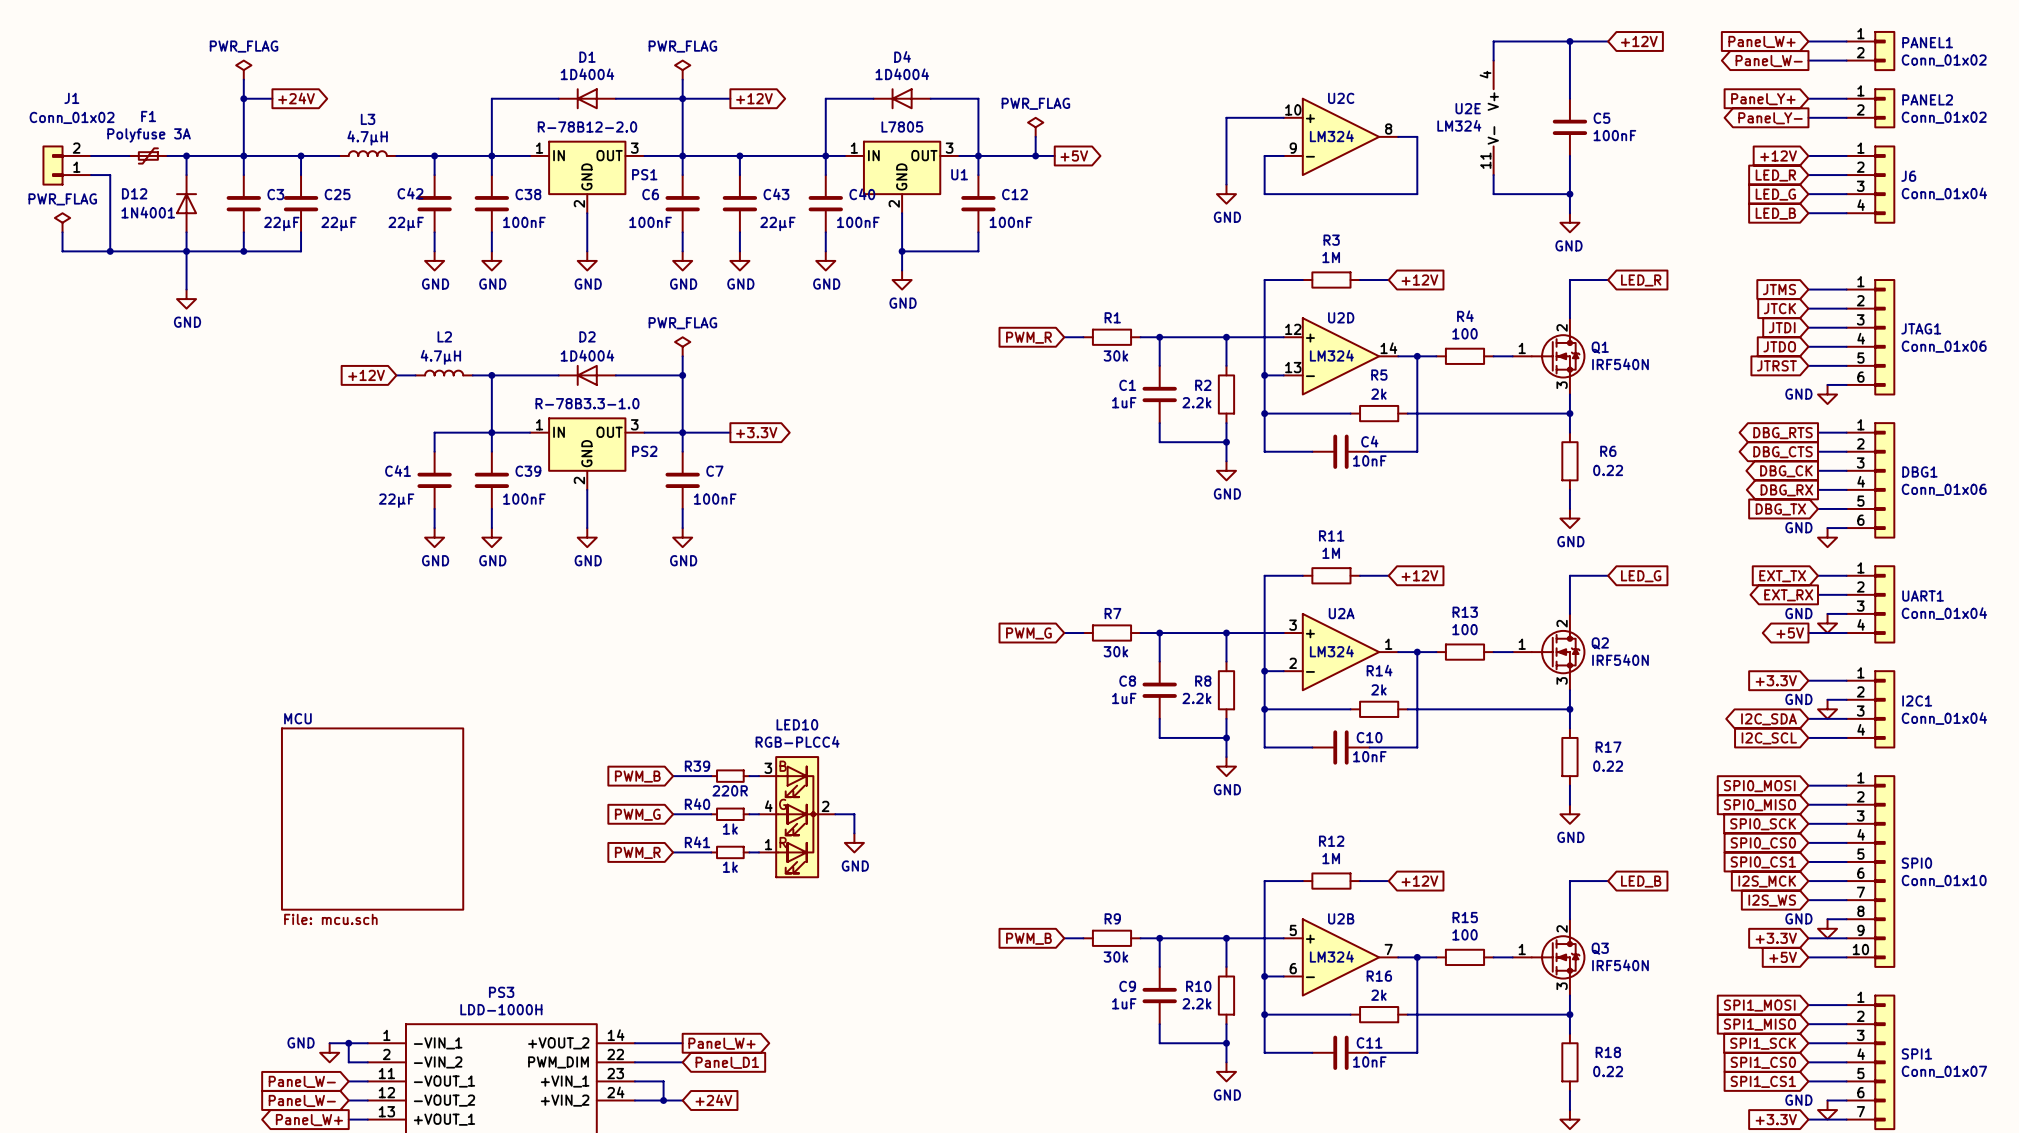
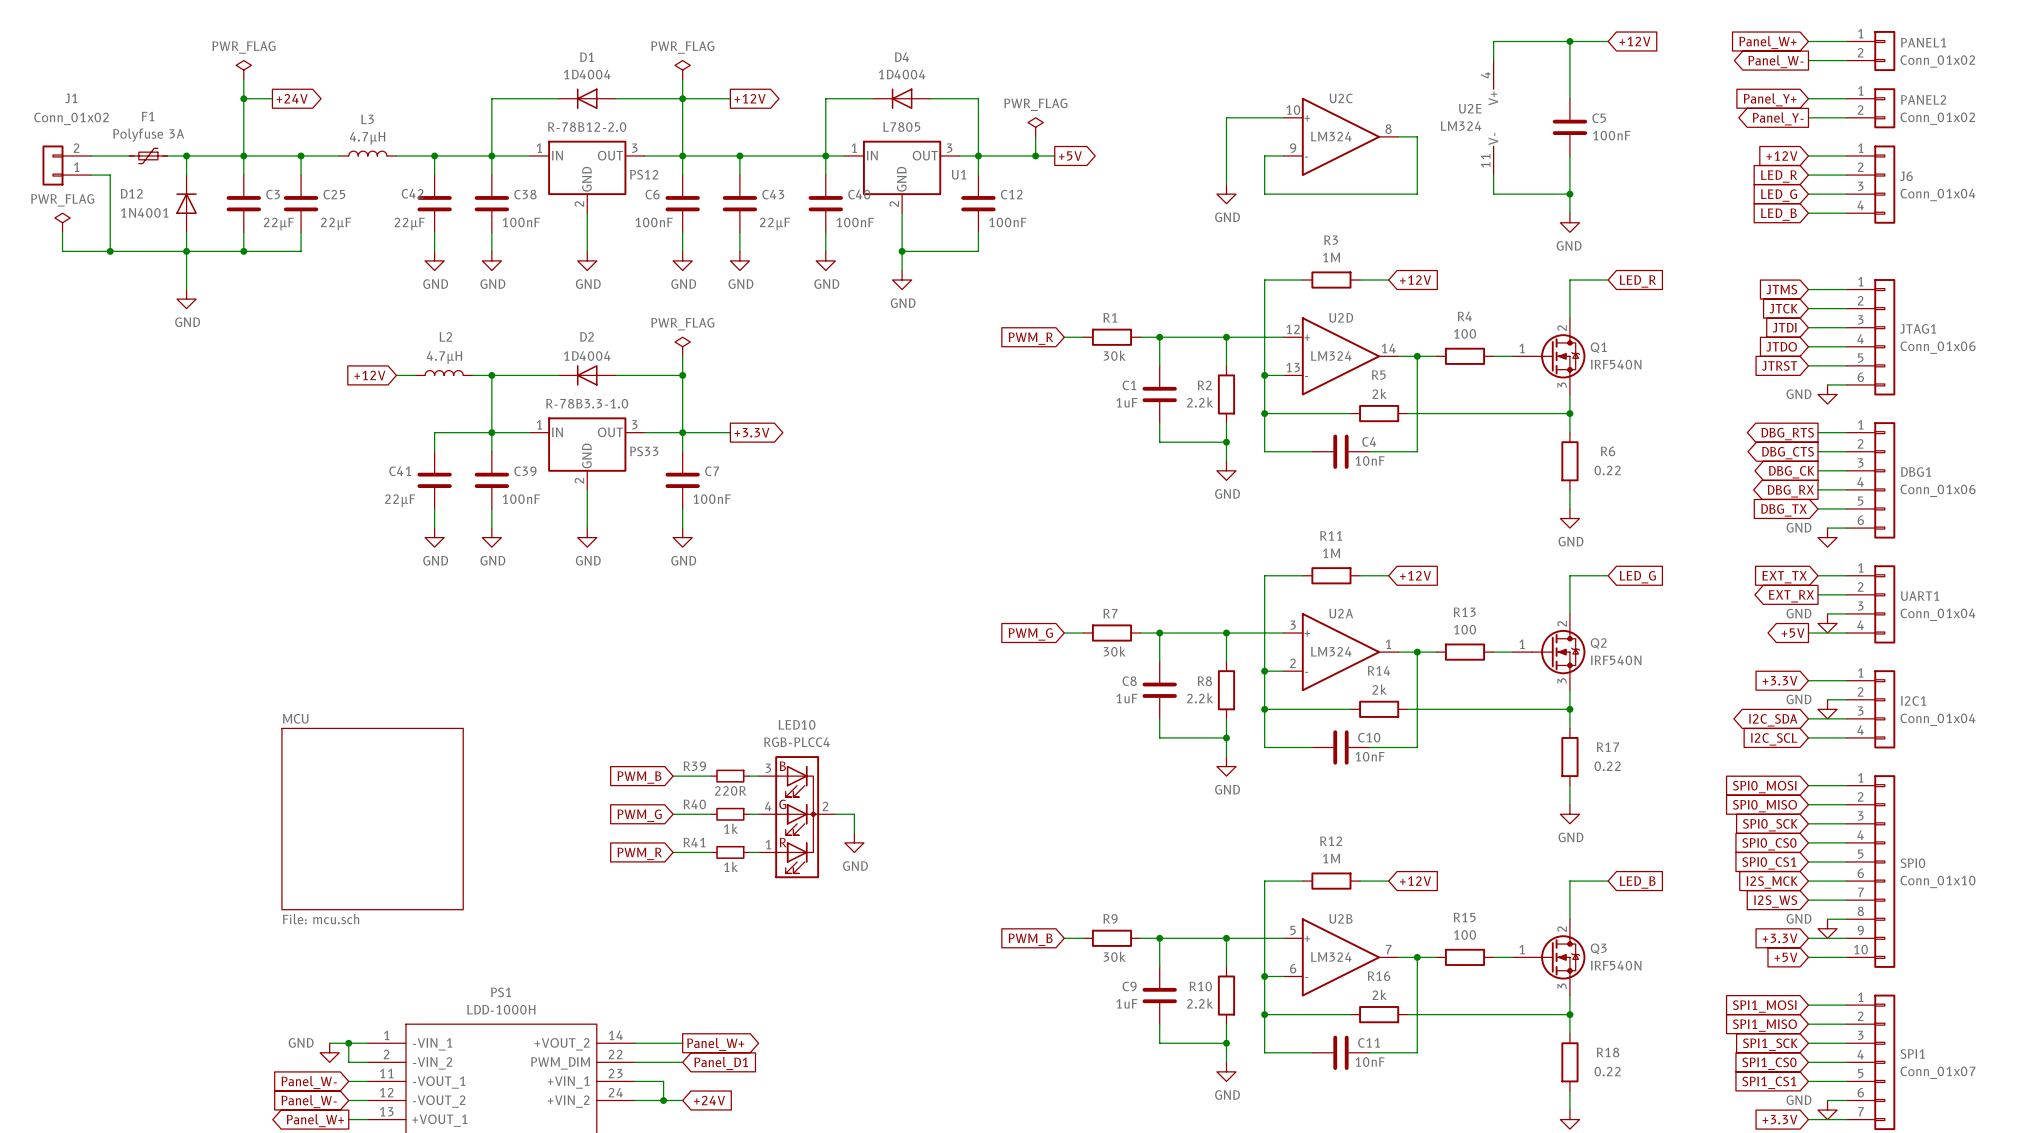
PS1 name: PS1 (644, 174) -> PS12 (644, 174)
PS2 name: PS2 (644, 451) -> PS33 (644, 451)
PS3 name: PS3 (501, 992) -> PS1 (501, 992)

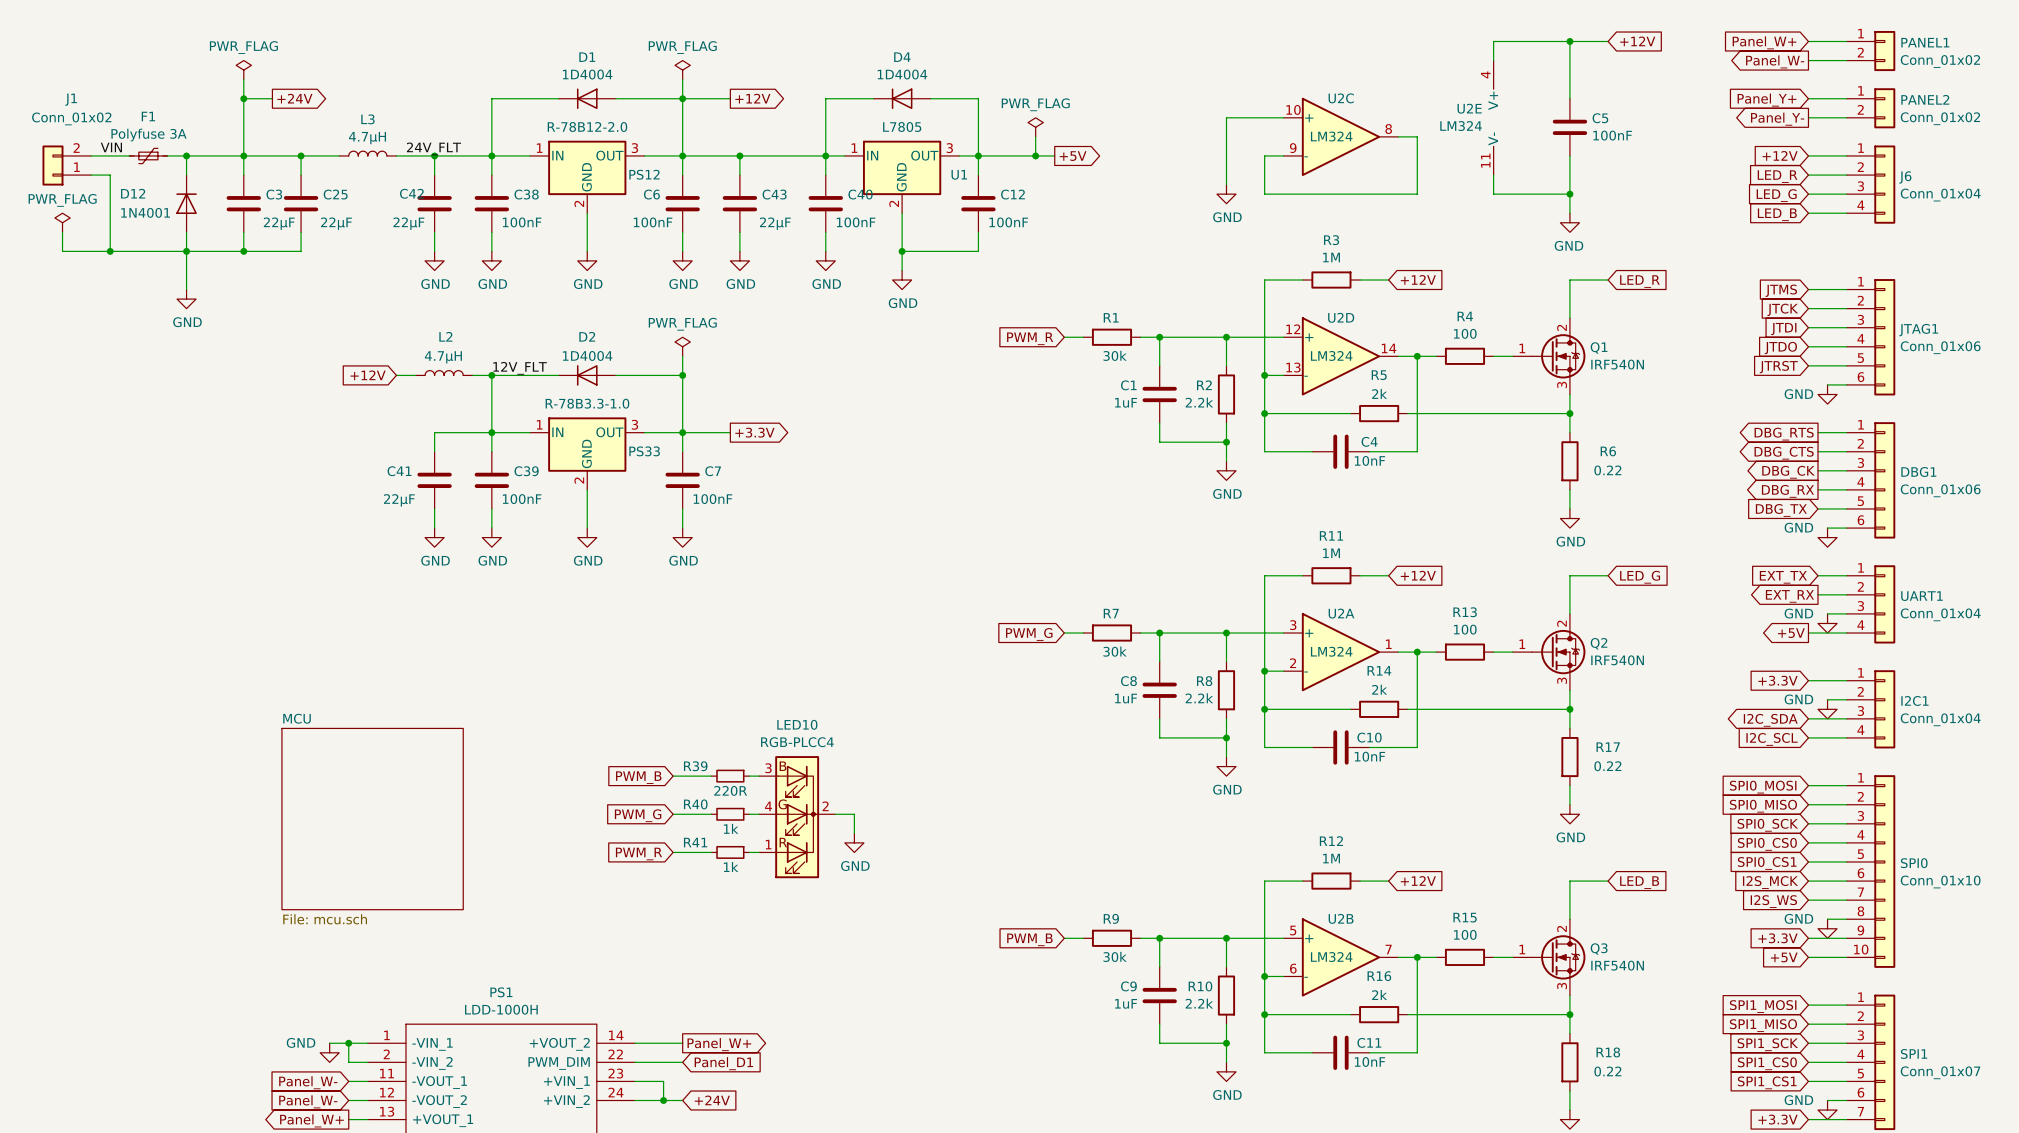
label: none -> VIN (111, 147)
label: none -> 24V_FLT (433, 148)
label: none -> 12V_FLT (520, 368)

